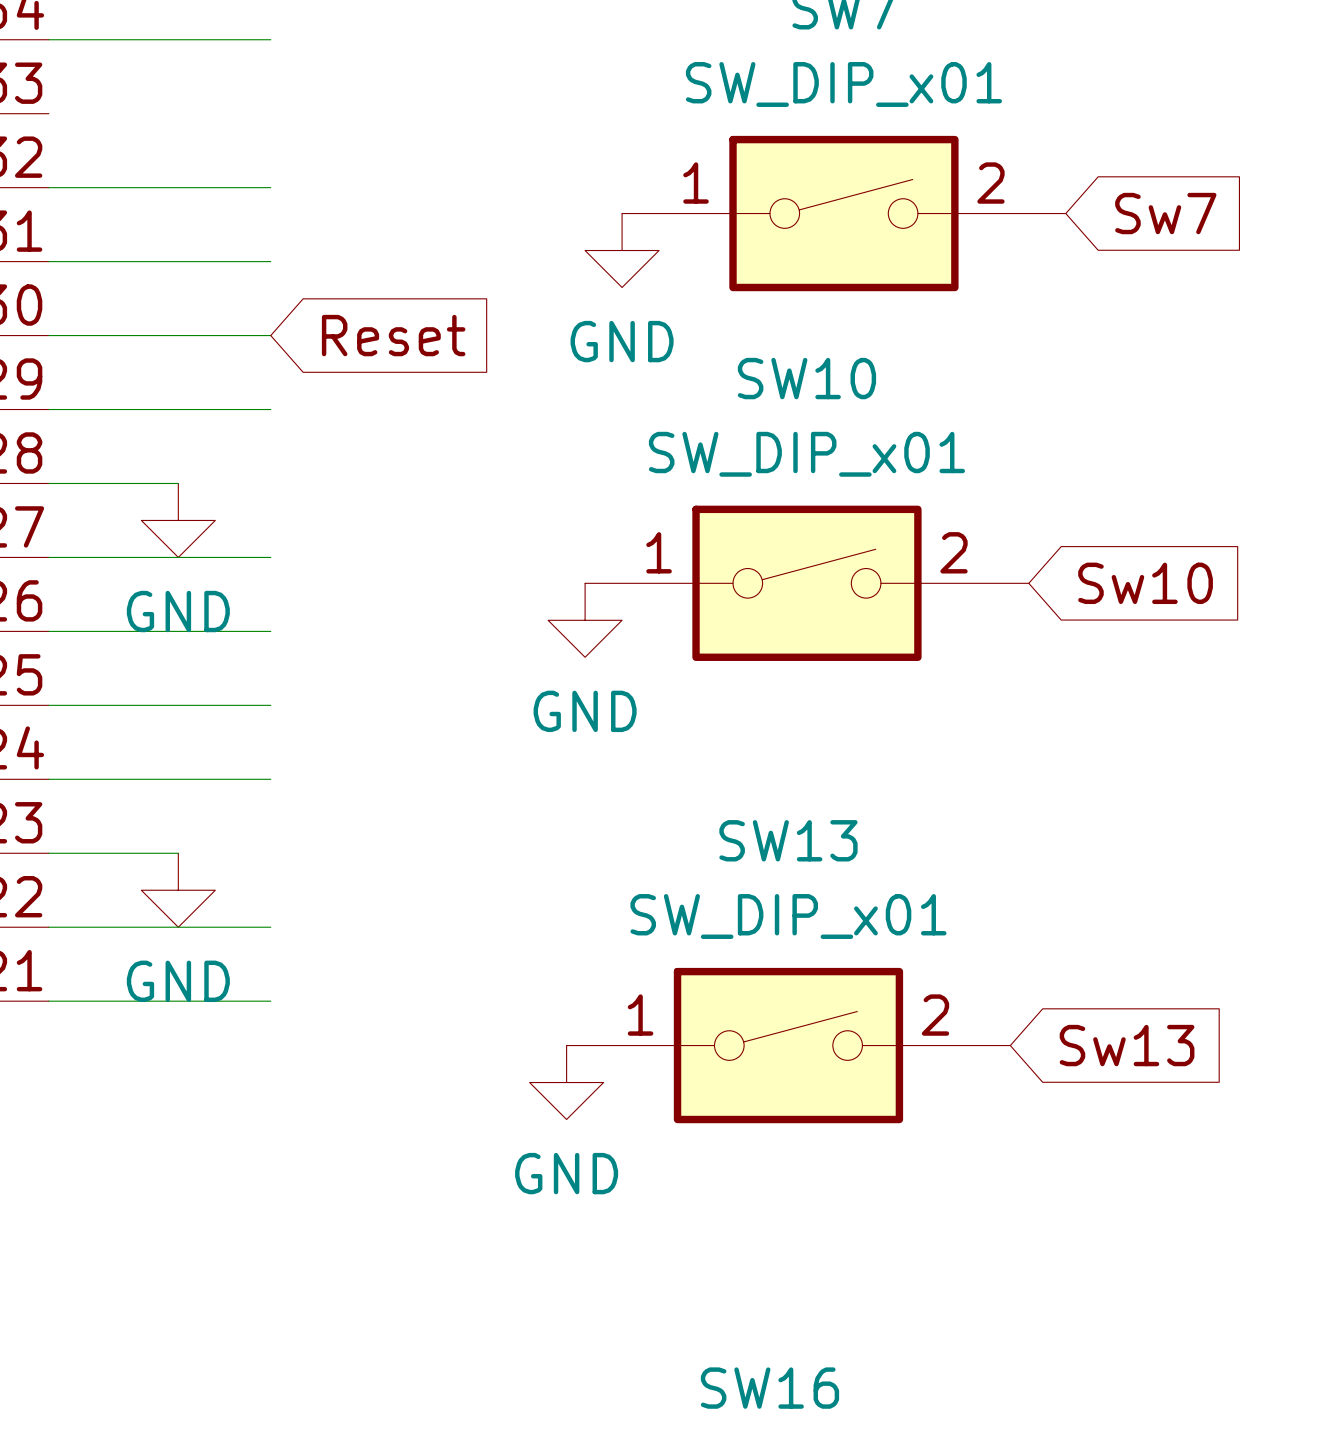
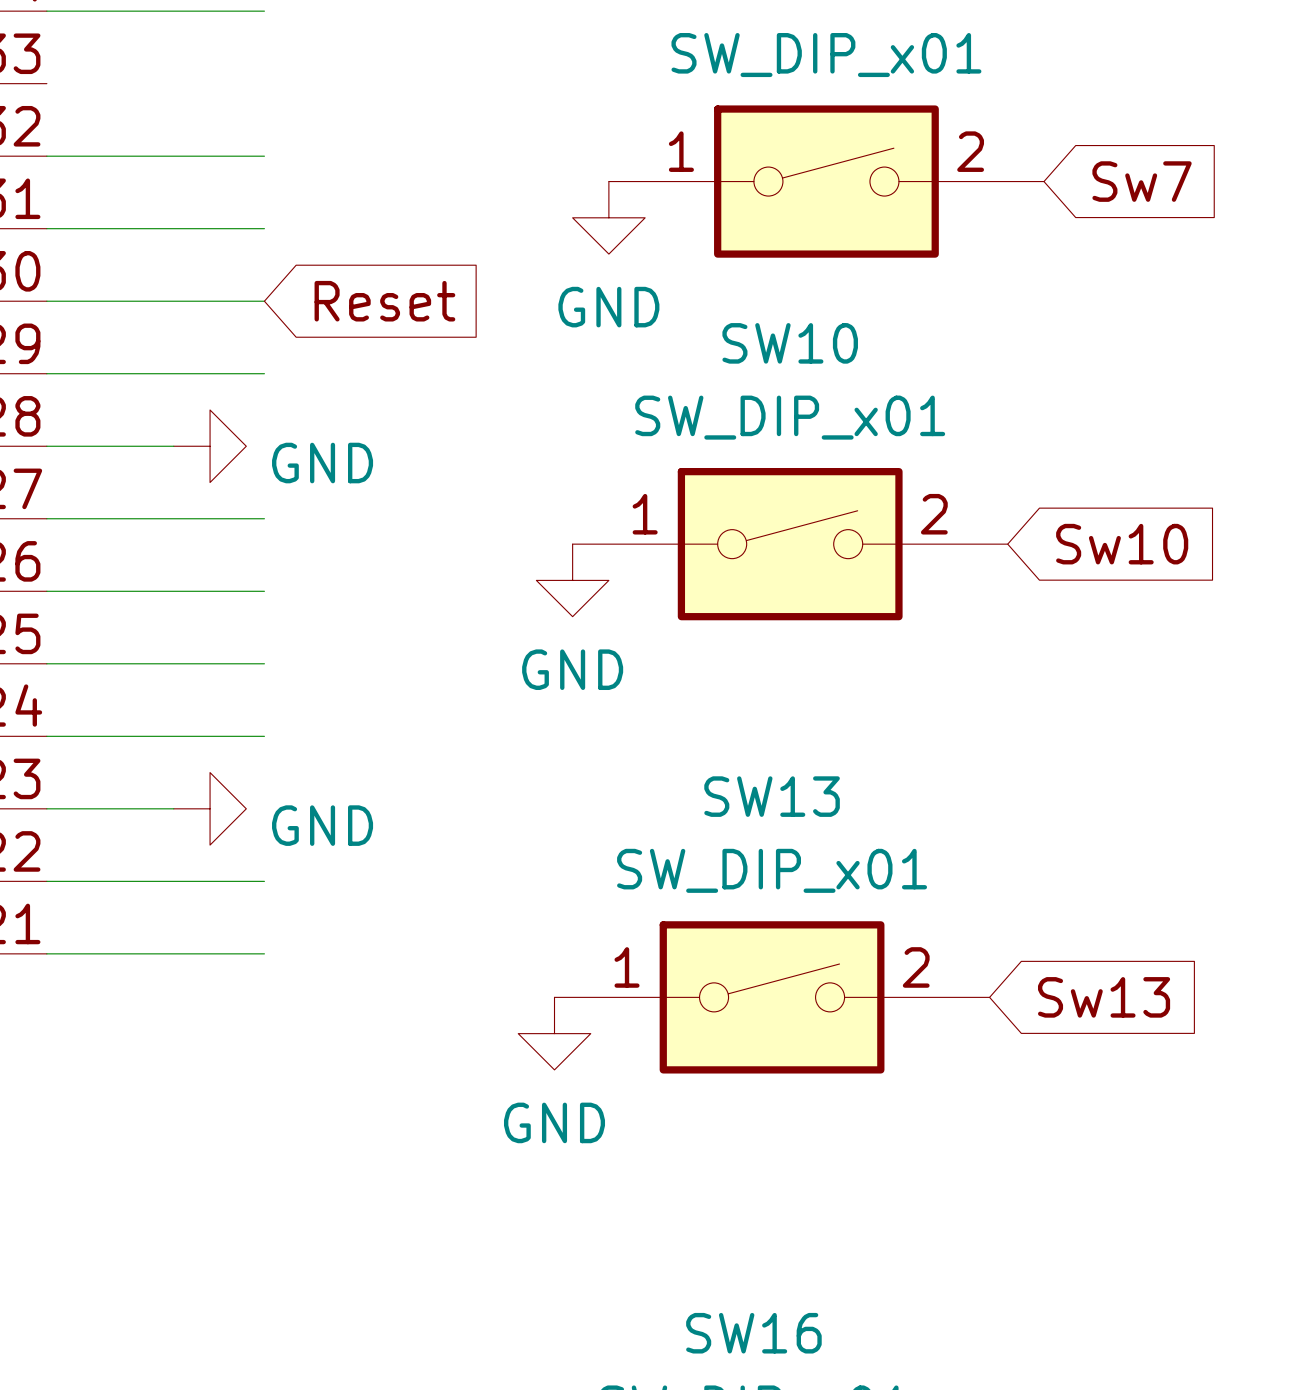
power symbol rotation: 0° (178, 520) -> 90° counterclockwise (210, 446)
power symbol position: GND (178, 520) -> GND (210, 446)
power symbol rotation: 0° (178, 890) -> 90° counterclockwise (210, 808)
power symbol position: GND (178, 890) -> GND (210, 808)

